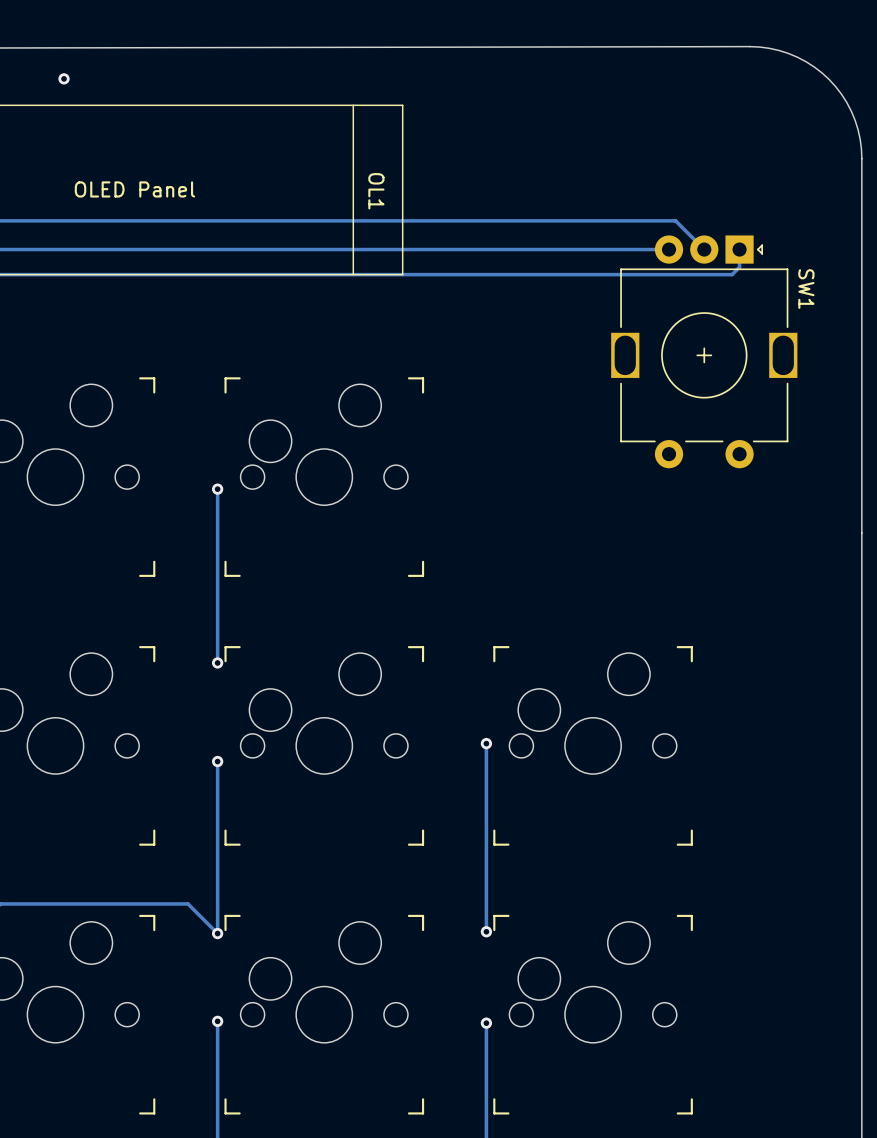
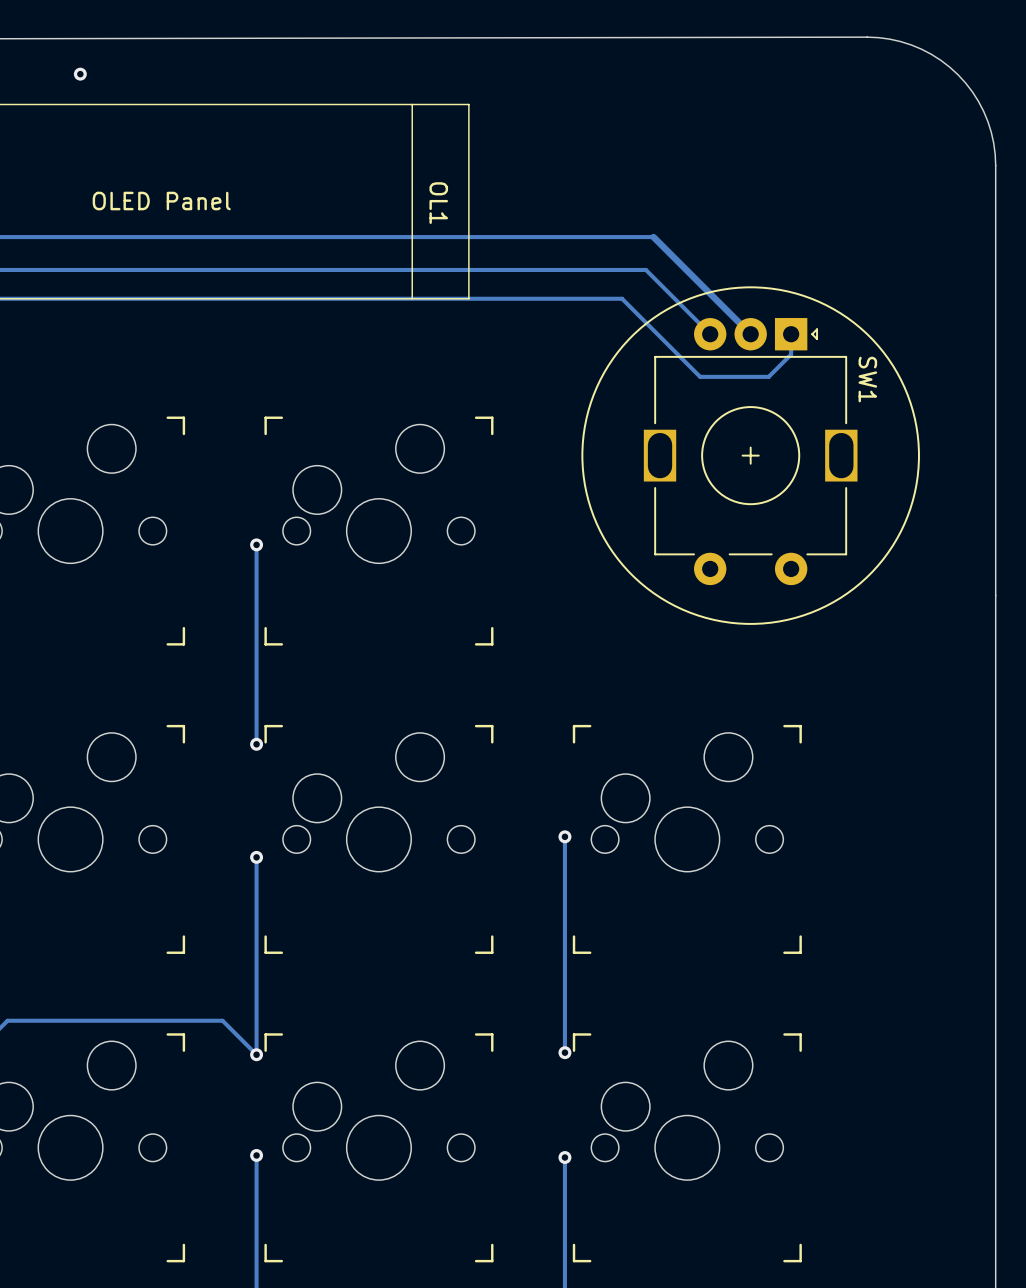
track: (563, 220) (675, 220) (704, 249) -> (653, 237) (750, 334)
track: (669, 249) (557, 249) -> (710, 334) (645, 269)
track: (739, 249) (739, 267) (732, 274) (536, 274) -> (791, 334) (791, 354) (768, 376) (700, 376) (622, 298)
drawing: none -> [581, 286, 920, 625]
SW1 position: (704, 351) -> (750, 451)

